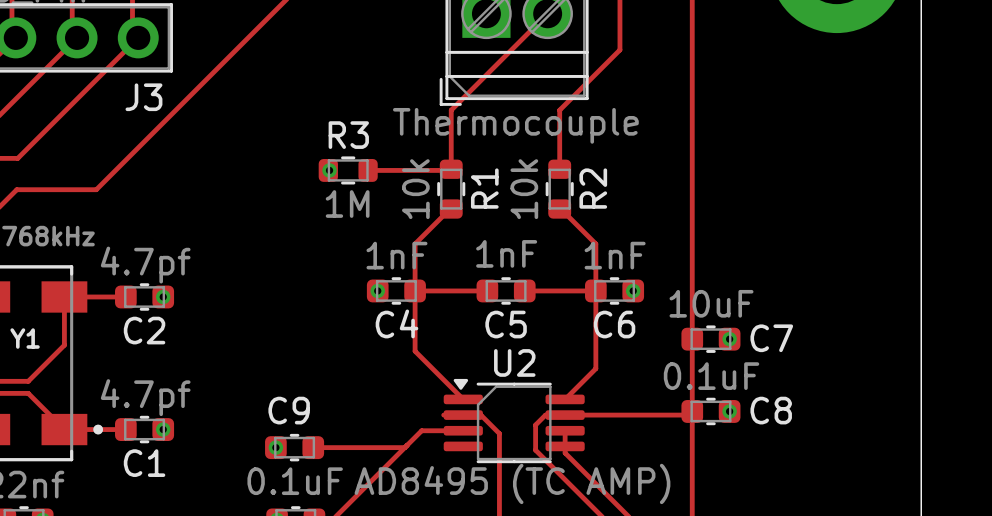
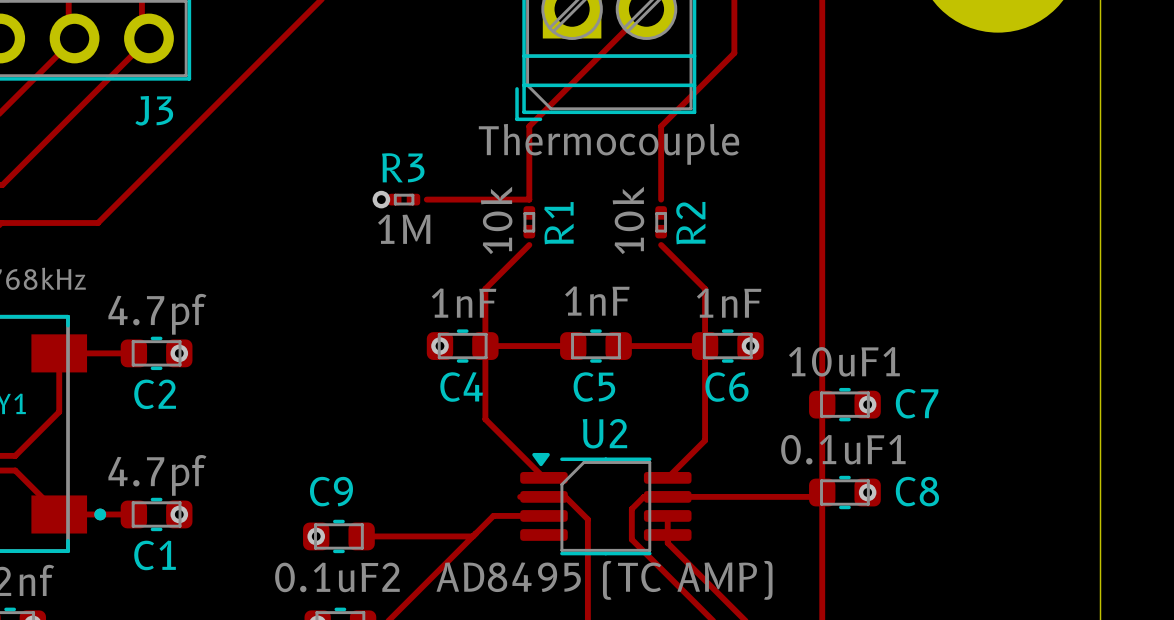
R3 footprint: [318, 156, 378, 185] -> [387, 193, 421, 206]
R1 footprint: [437, 159, 466, 219] -> [523, 206, 536, 239]
R2 footprint: [545, 159, 574, 219] -> [655, 206, 667, 239]
C7 value: 10uF (711, 303) -> 10uF1 (844, 361)
C8 value: 0.1uF (711, 376) -> 0.1uF1 (843, 449)
C9 value: 0.1uF (295, 481) -> 0.1uF2 (337, 577)

